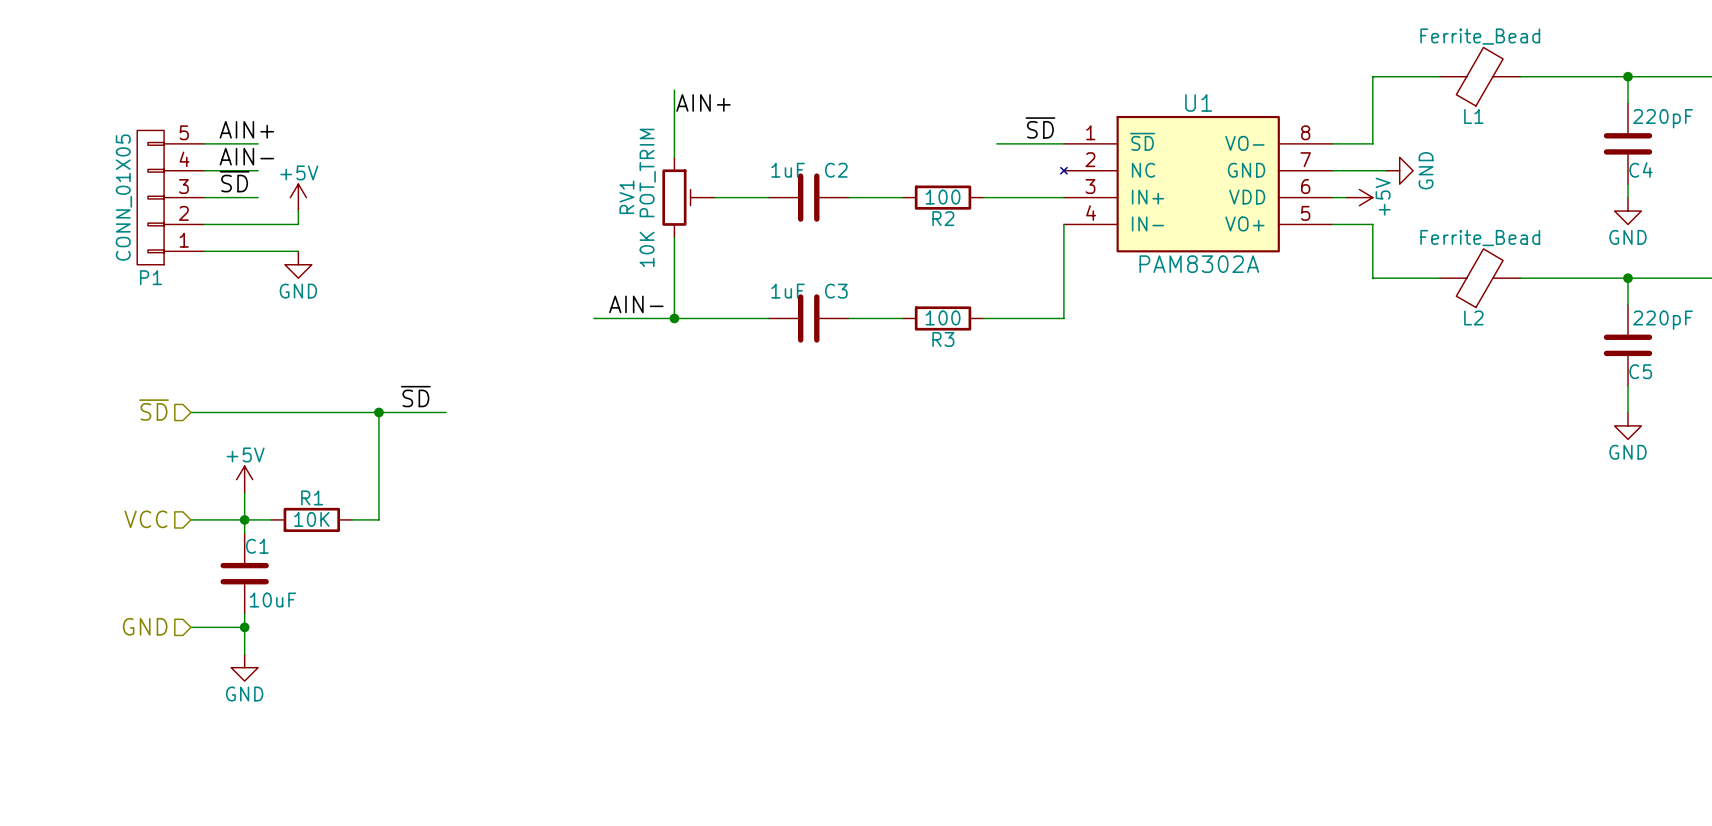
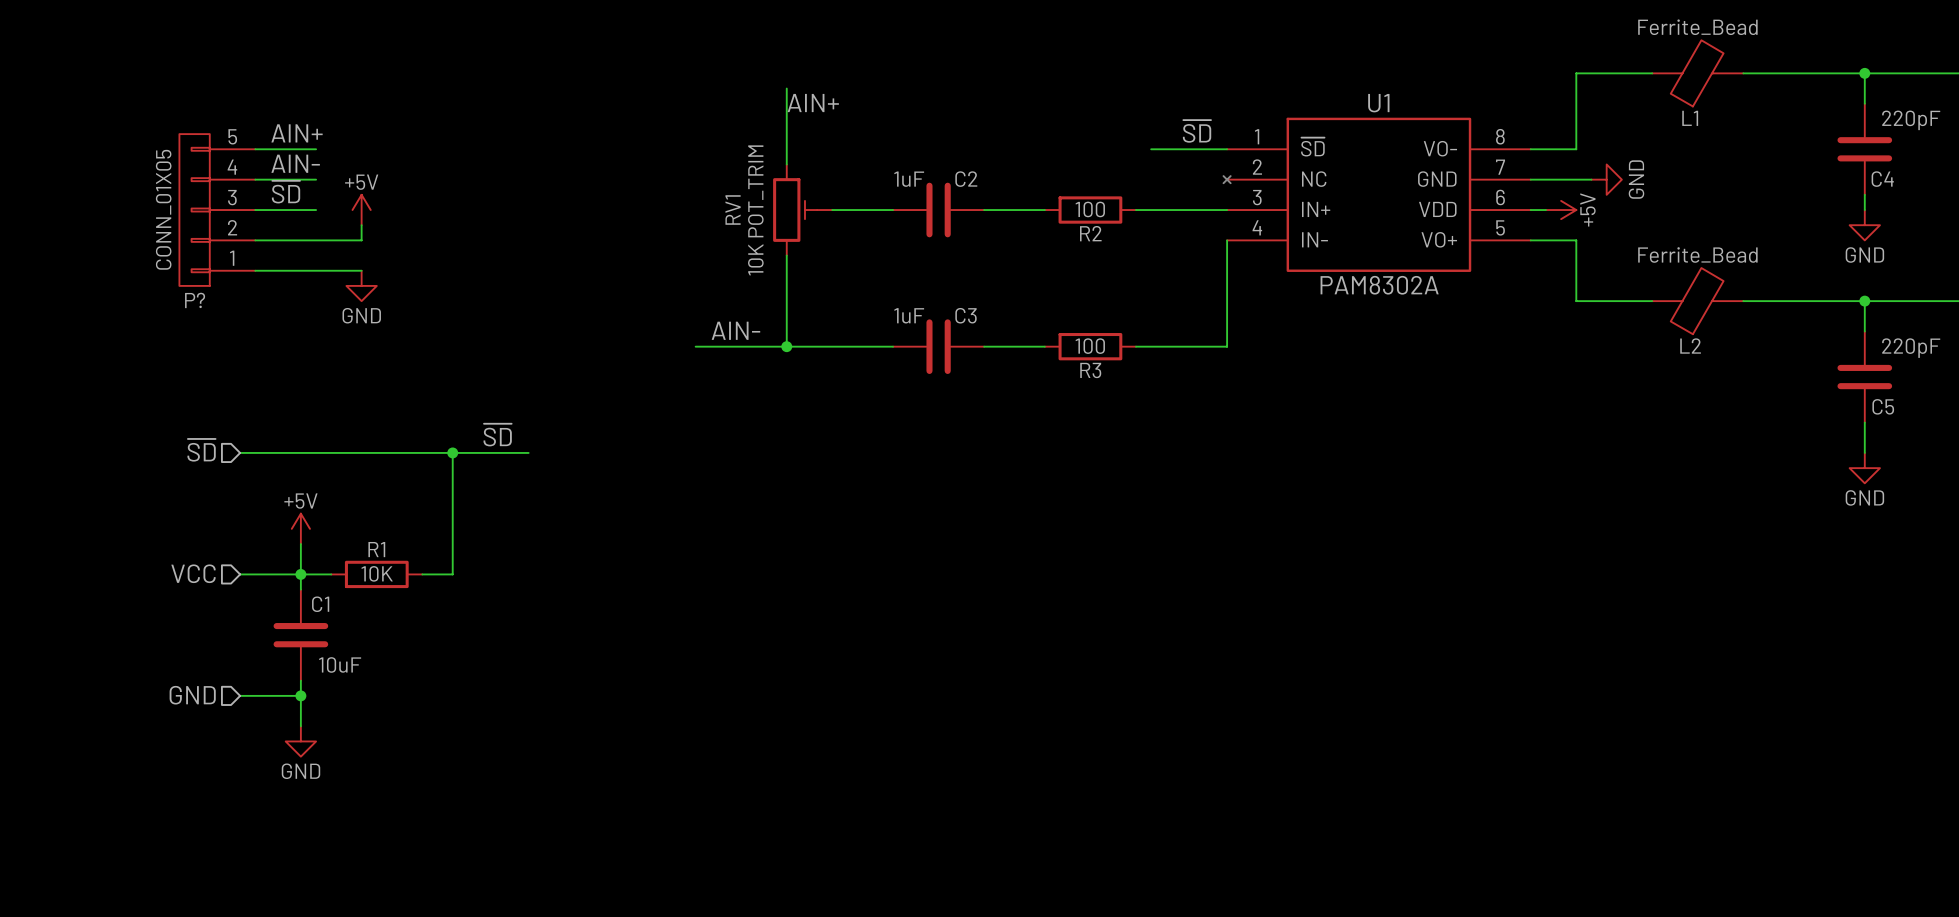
P1 name: P1 (150, 277) -> P? (195, 300)

